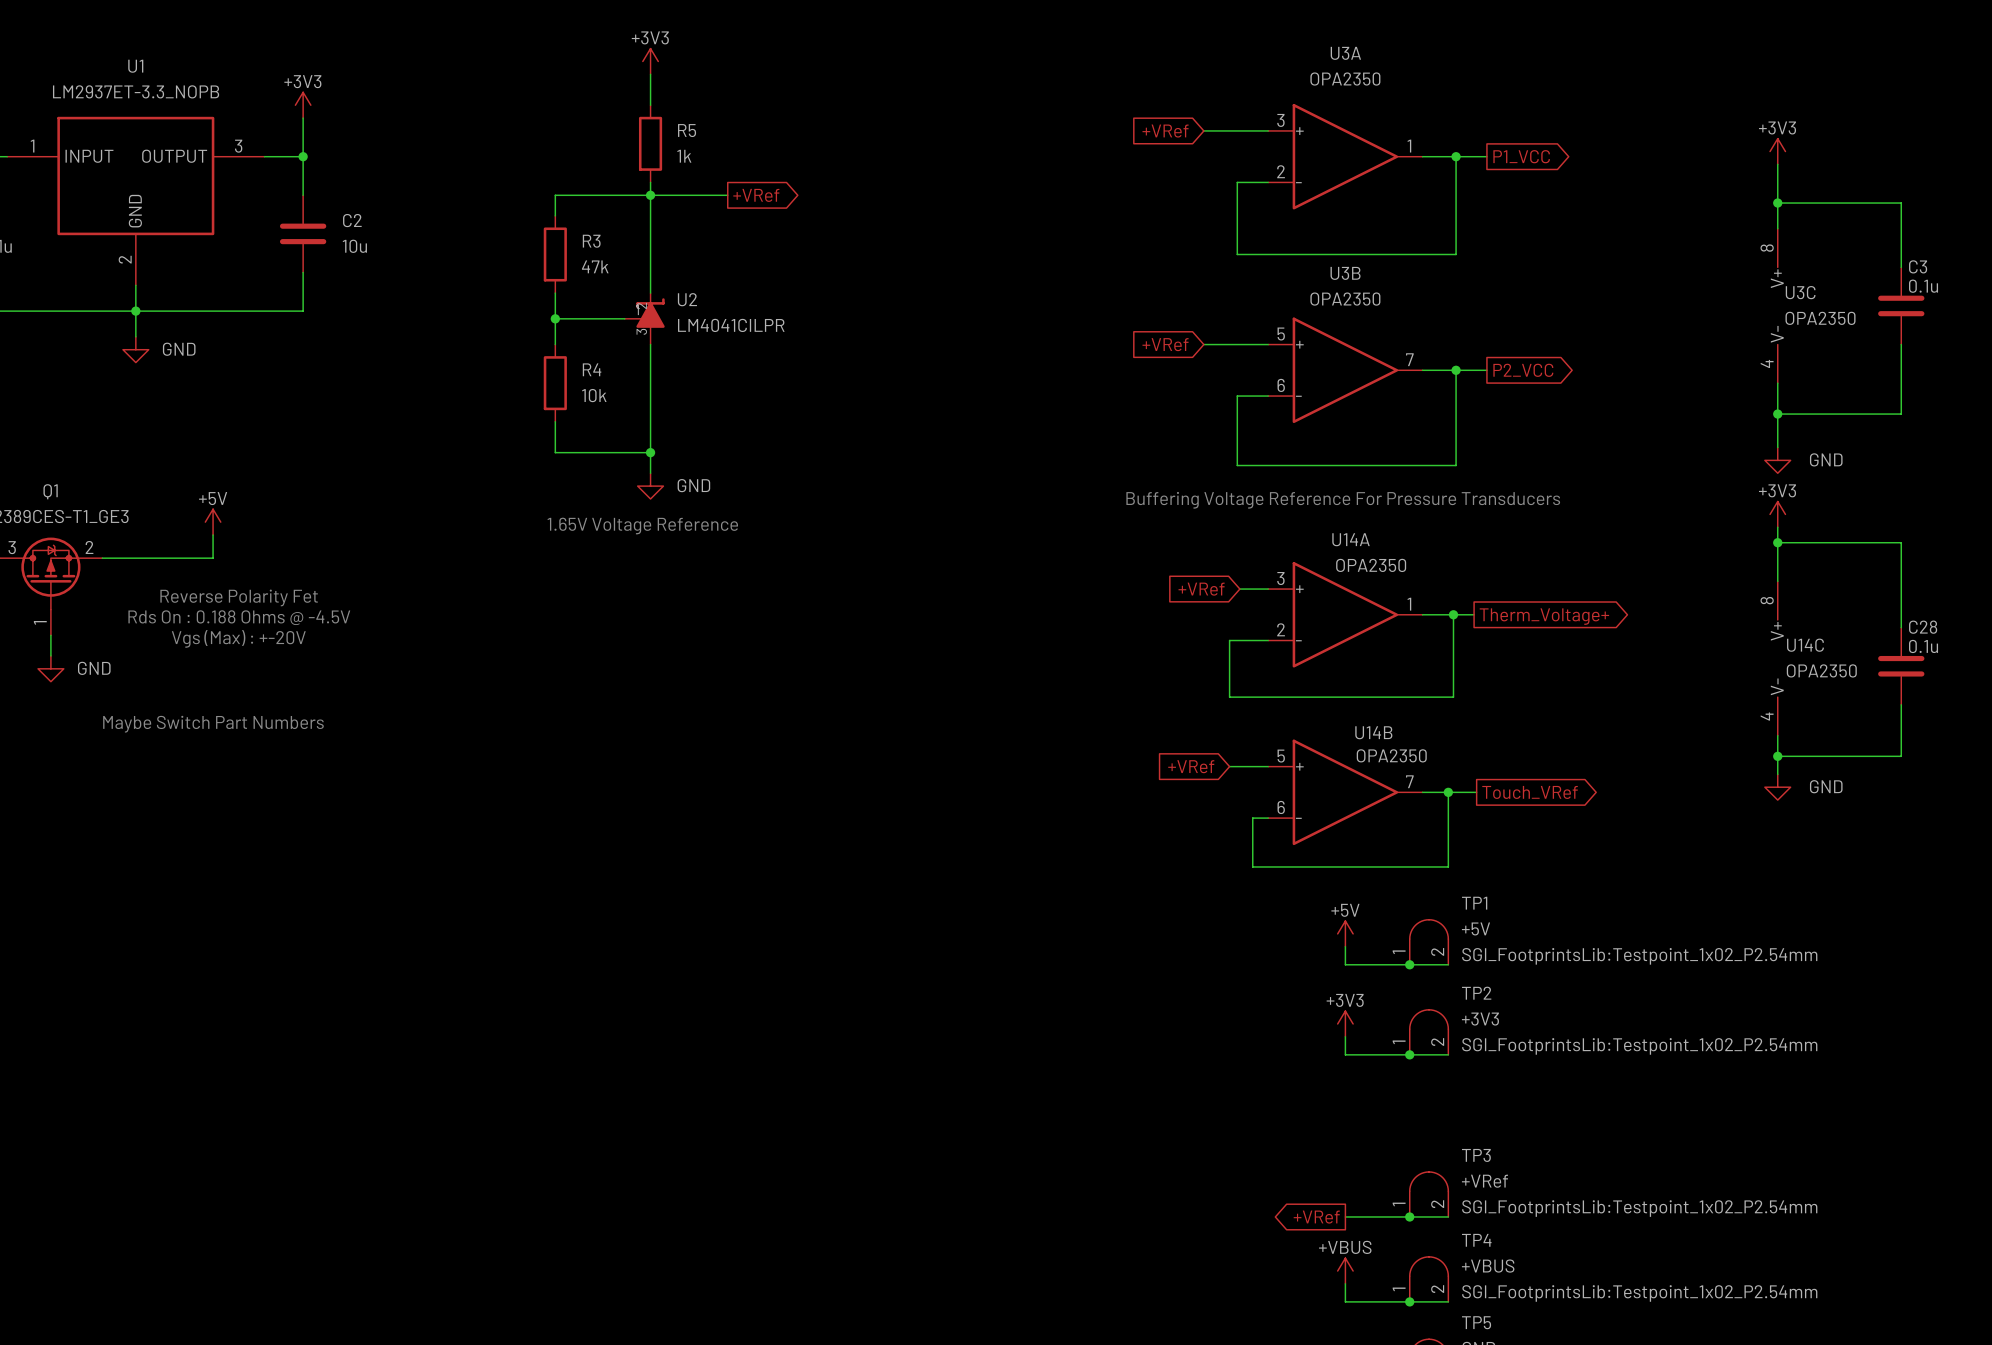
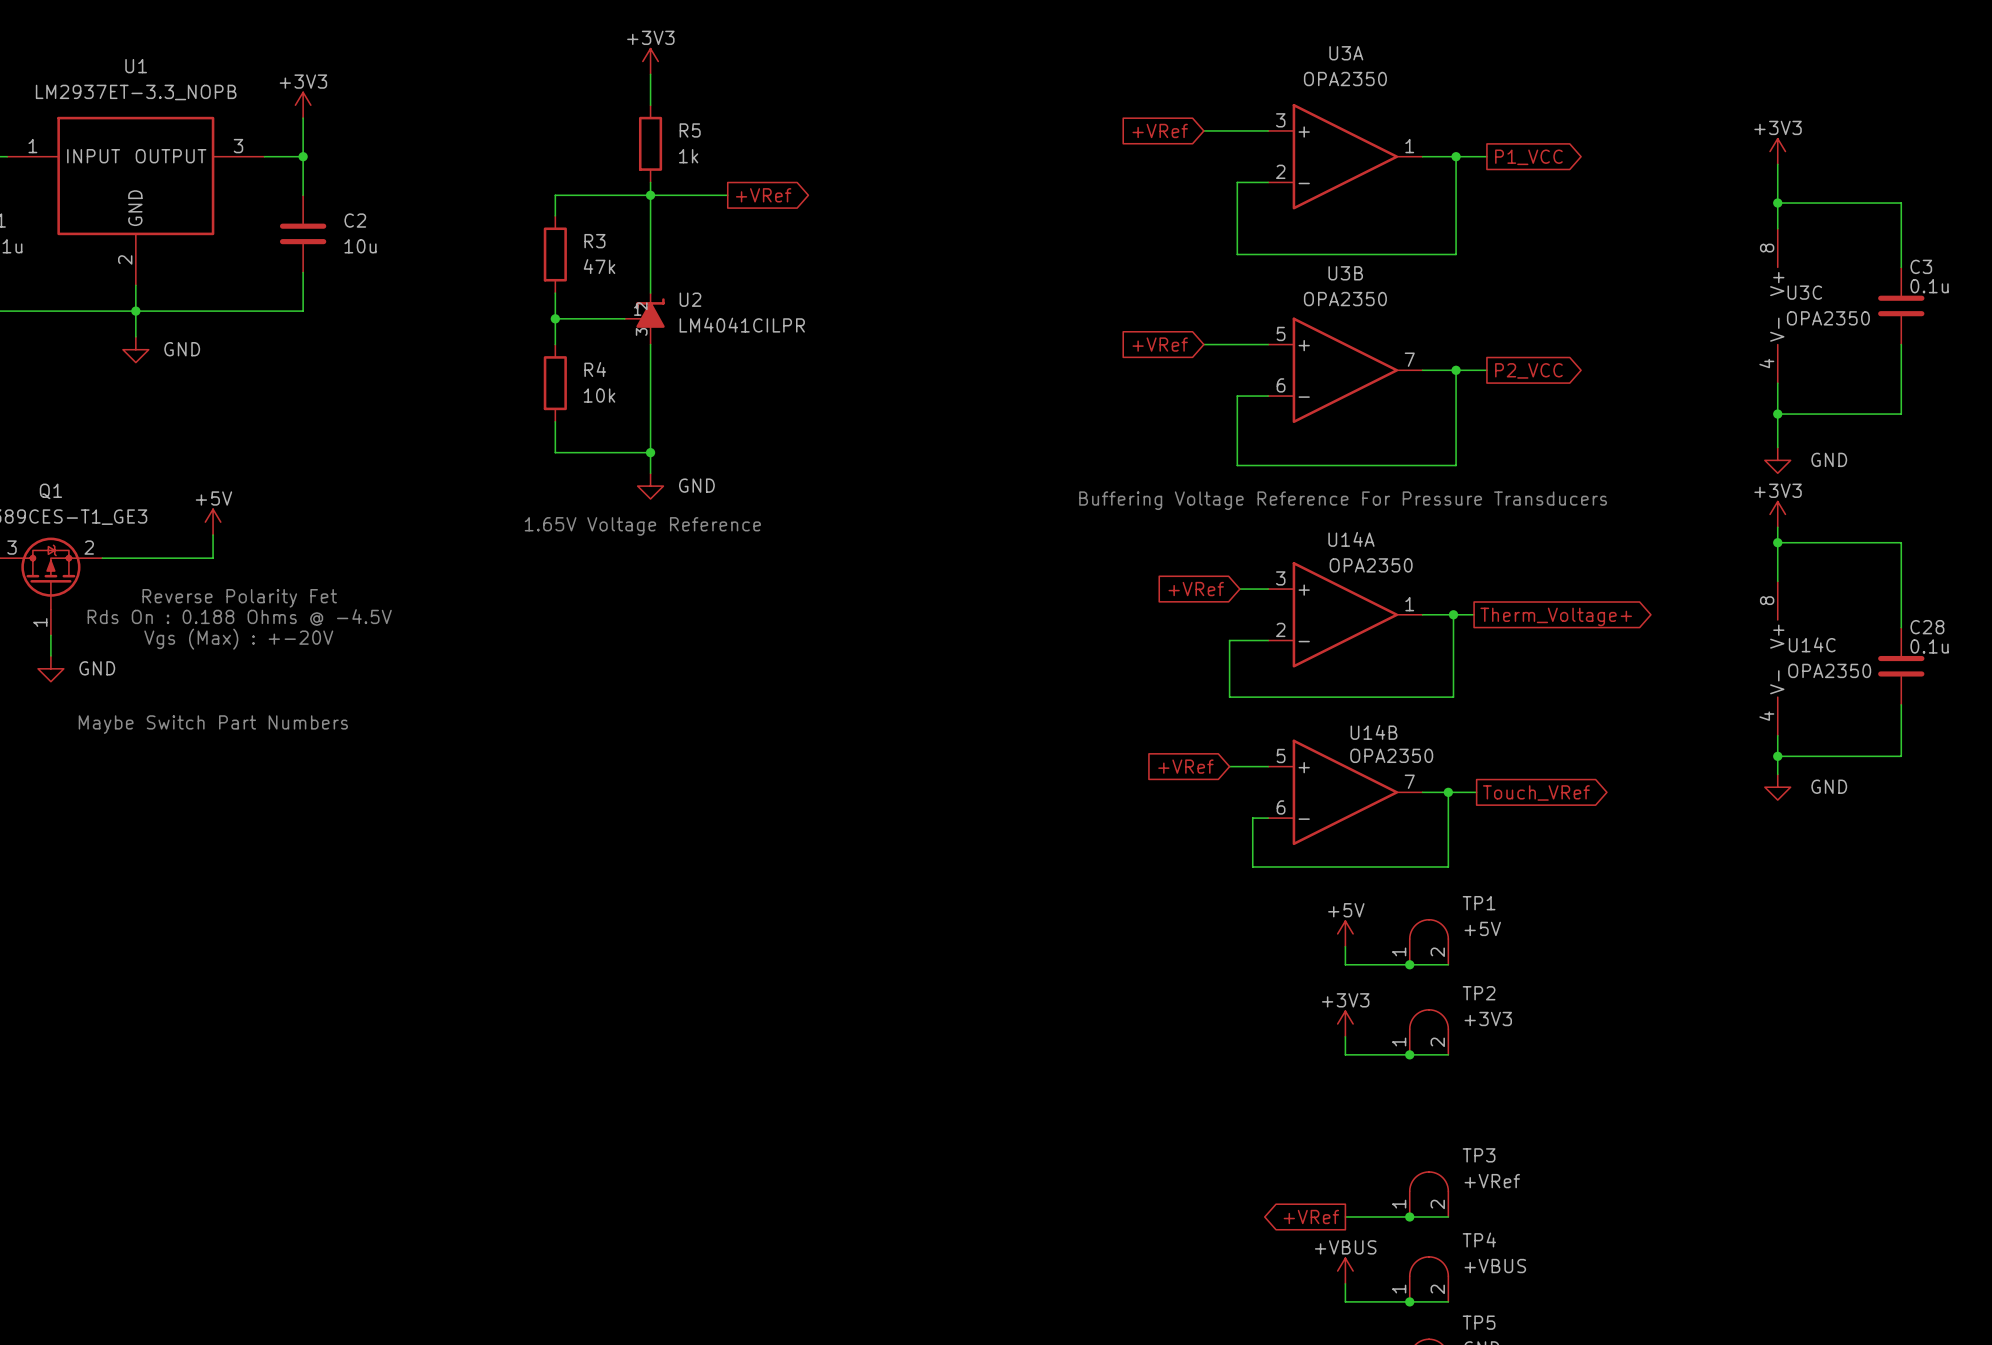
TP1 text: SGI_FootprintsLib:Testpoint_1x02_P2.54mm (1639, 956) -> none
TP2 text: SGI_FootprintsLib:Testpoint_1x02_P2.54mm (1639, 1046) -> none
TP3 text: SGI_FootprintsLib:Testpoint_1x02_P2.54mm (1639, 1208) -> none
TP4 text: SGI_FootprintsLib:Testpoint_1x02_P2.54mm (1639, 1293) -> none

